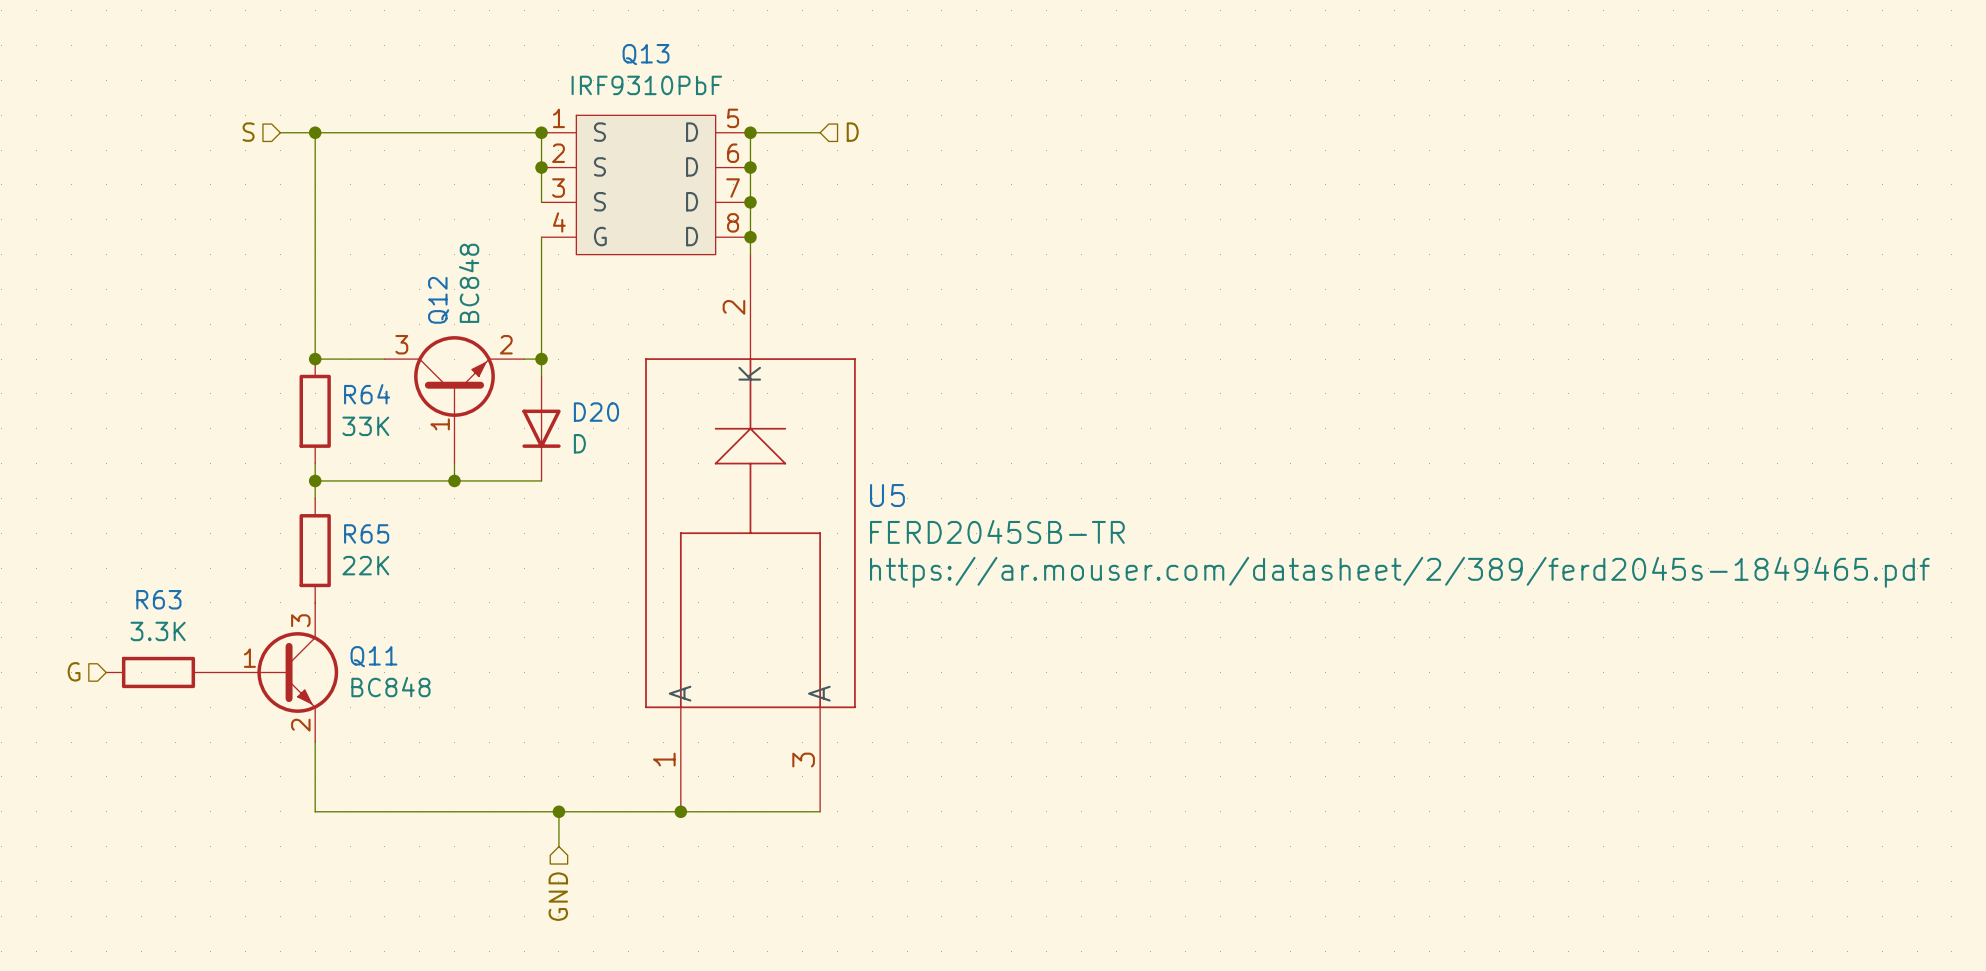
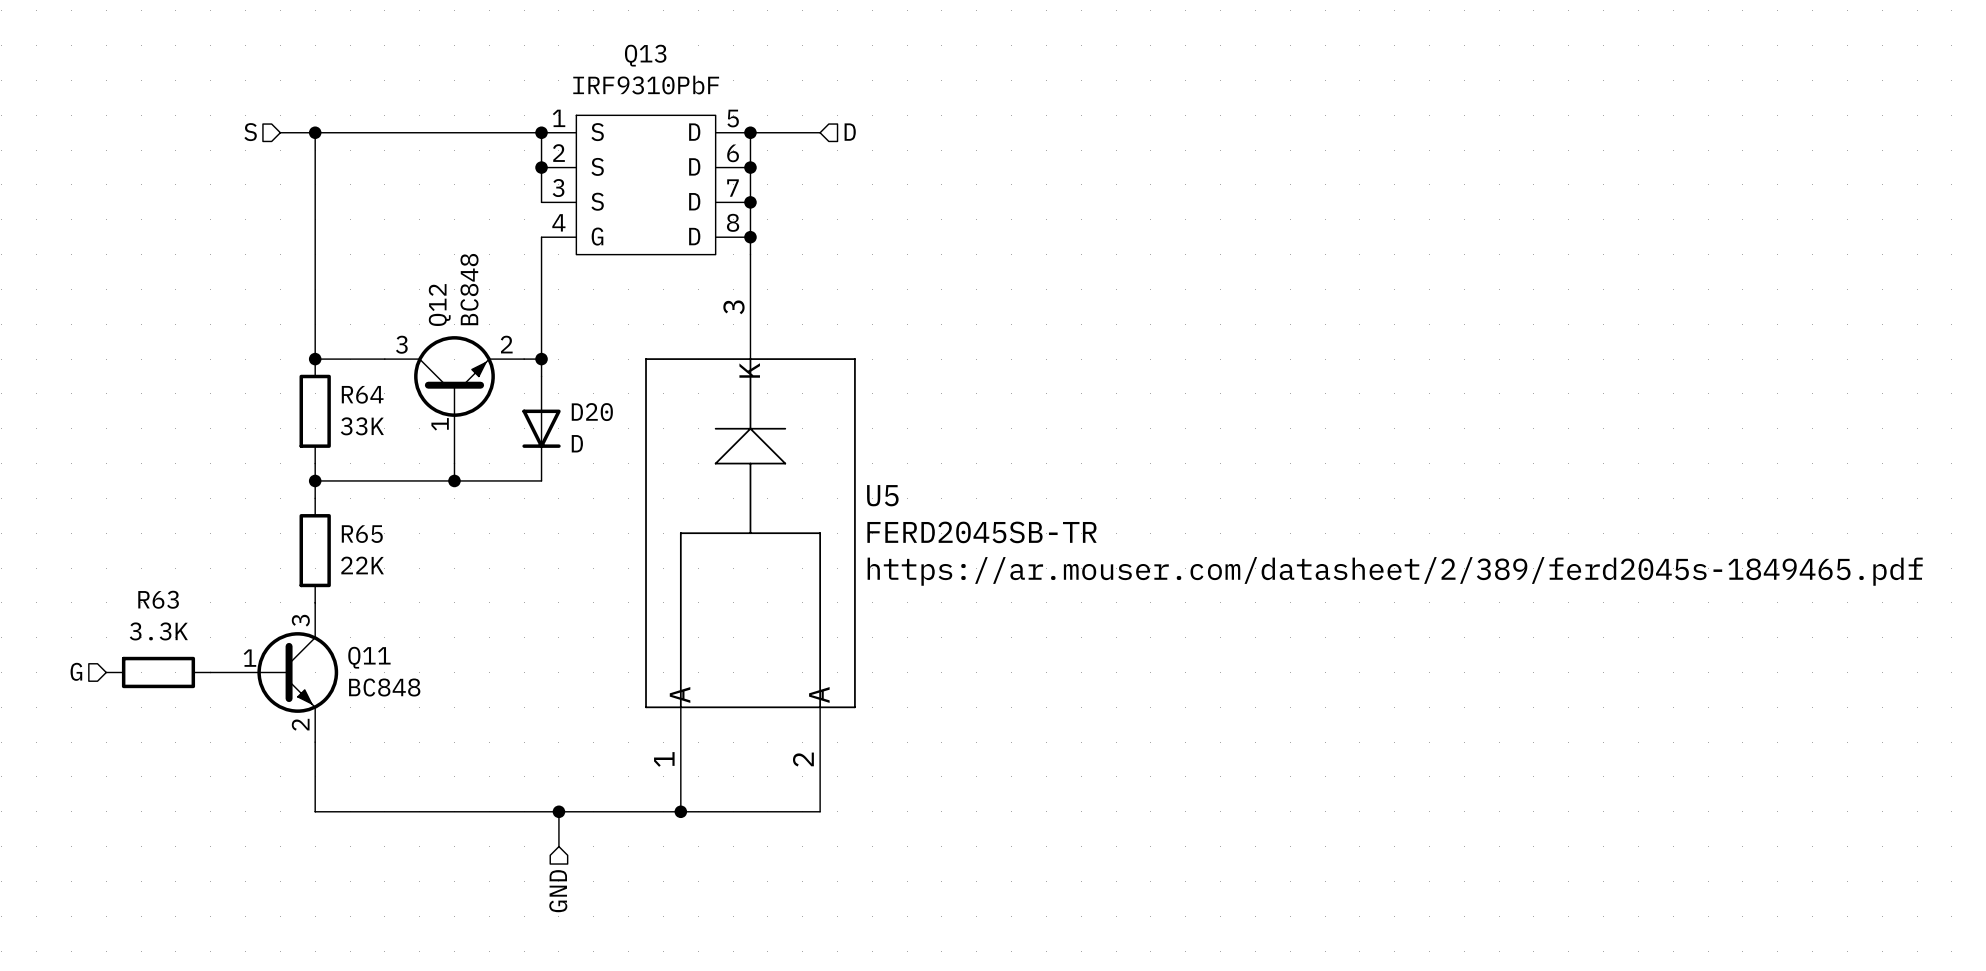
U5 pin number: 2 (733, 307) -> 3 (733, 307)
U5 pin number: 3 (803, 760) -> 2 (803, 759)

